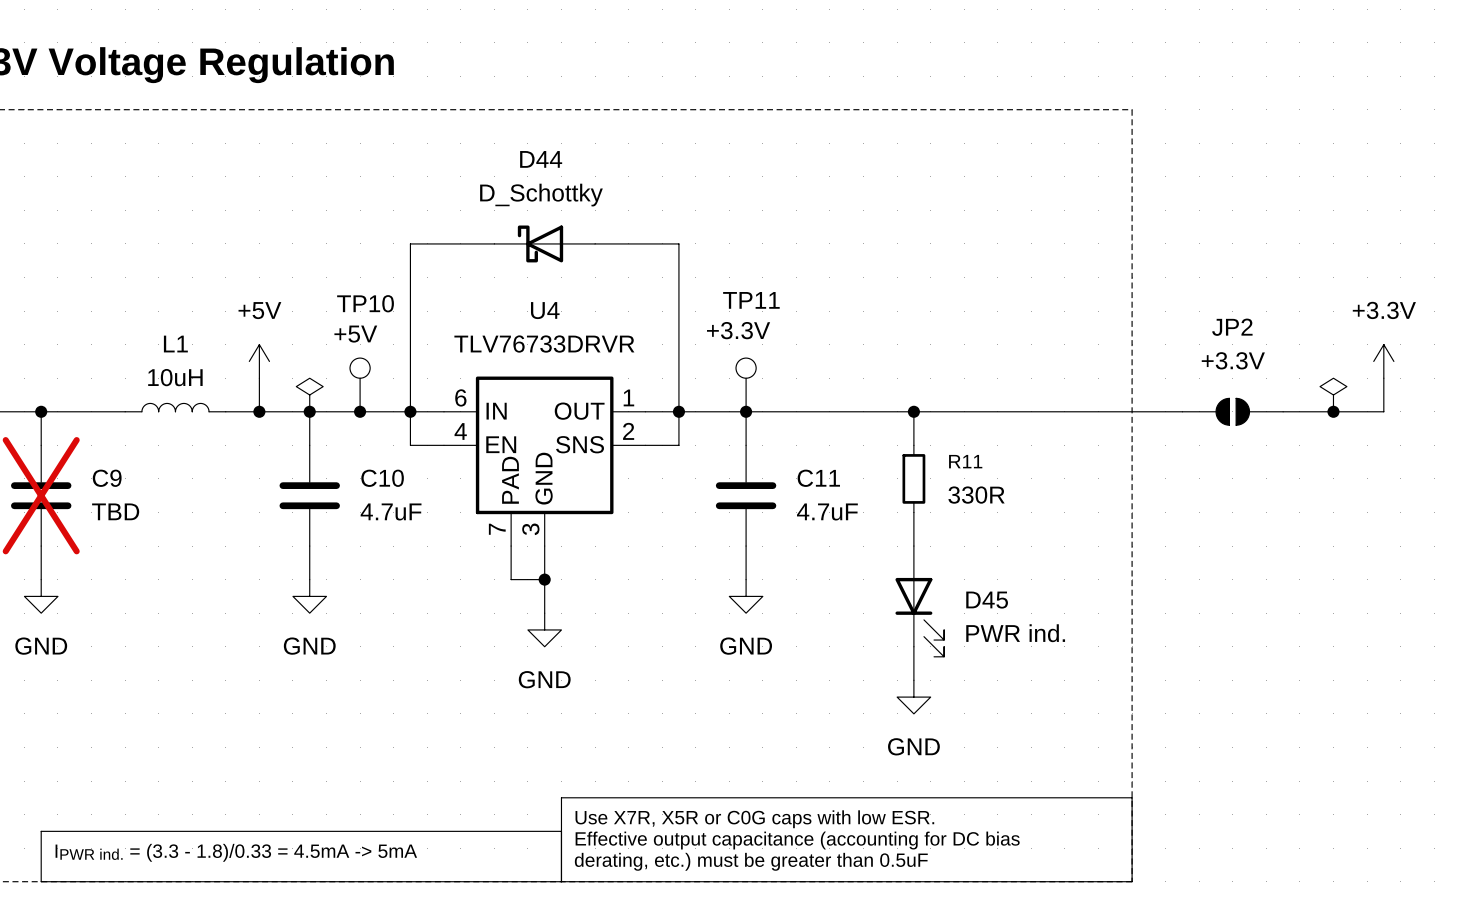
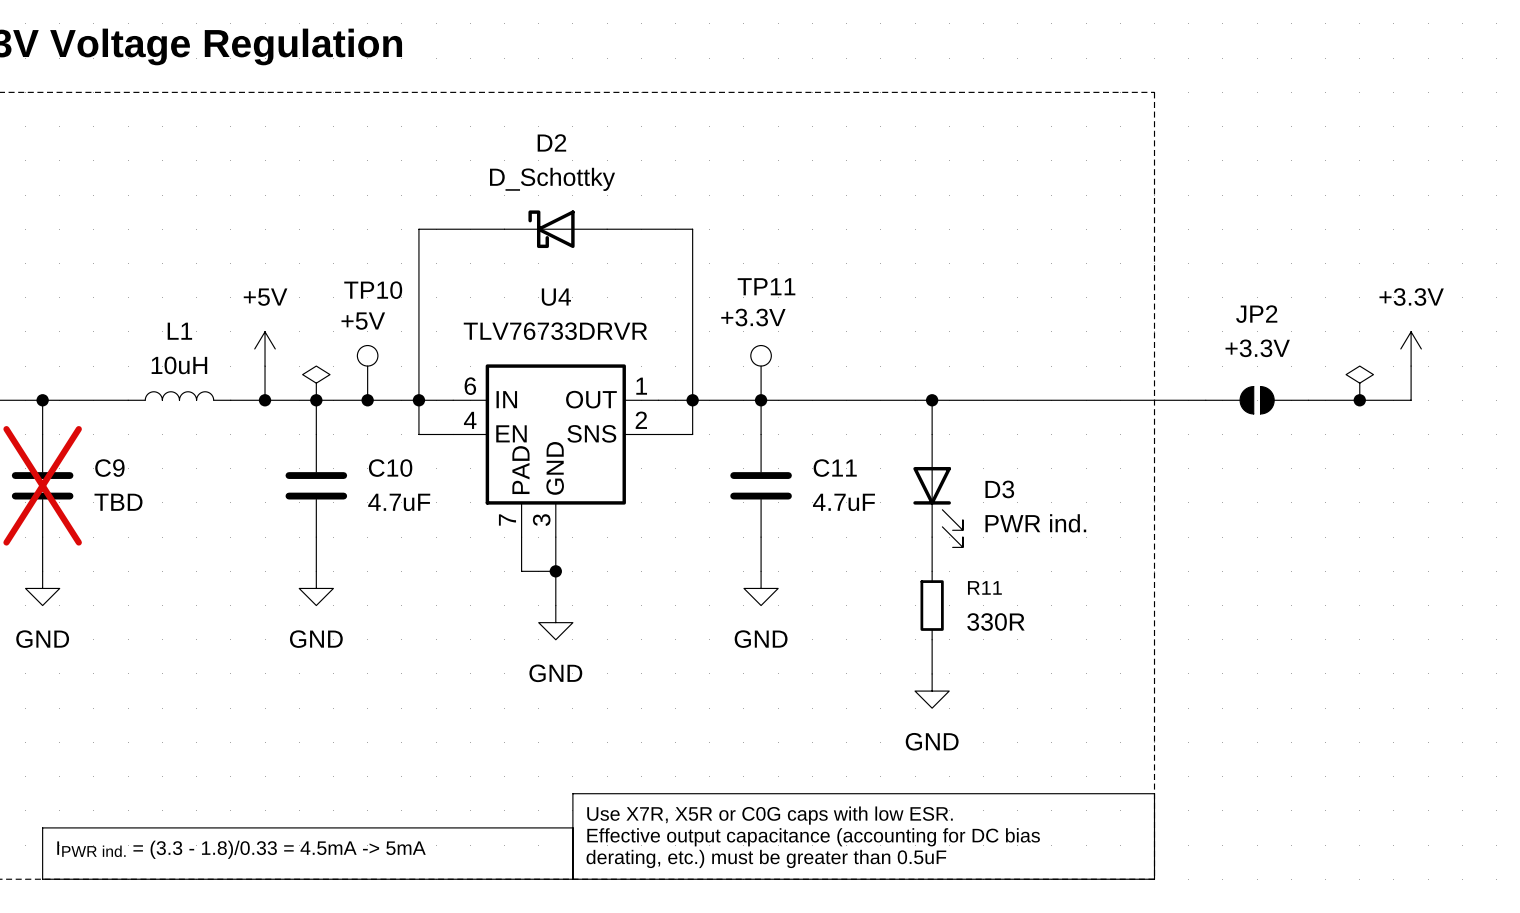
D44 name: D44 (541, 159) -> D2 (551, 142)
R11 position: (913, 478) -> (932, 605)
D3: none -> PWR ind. (938, 490)
D45: PWR ind. (919, 601) -> none

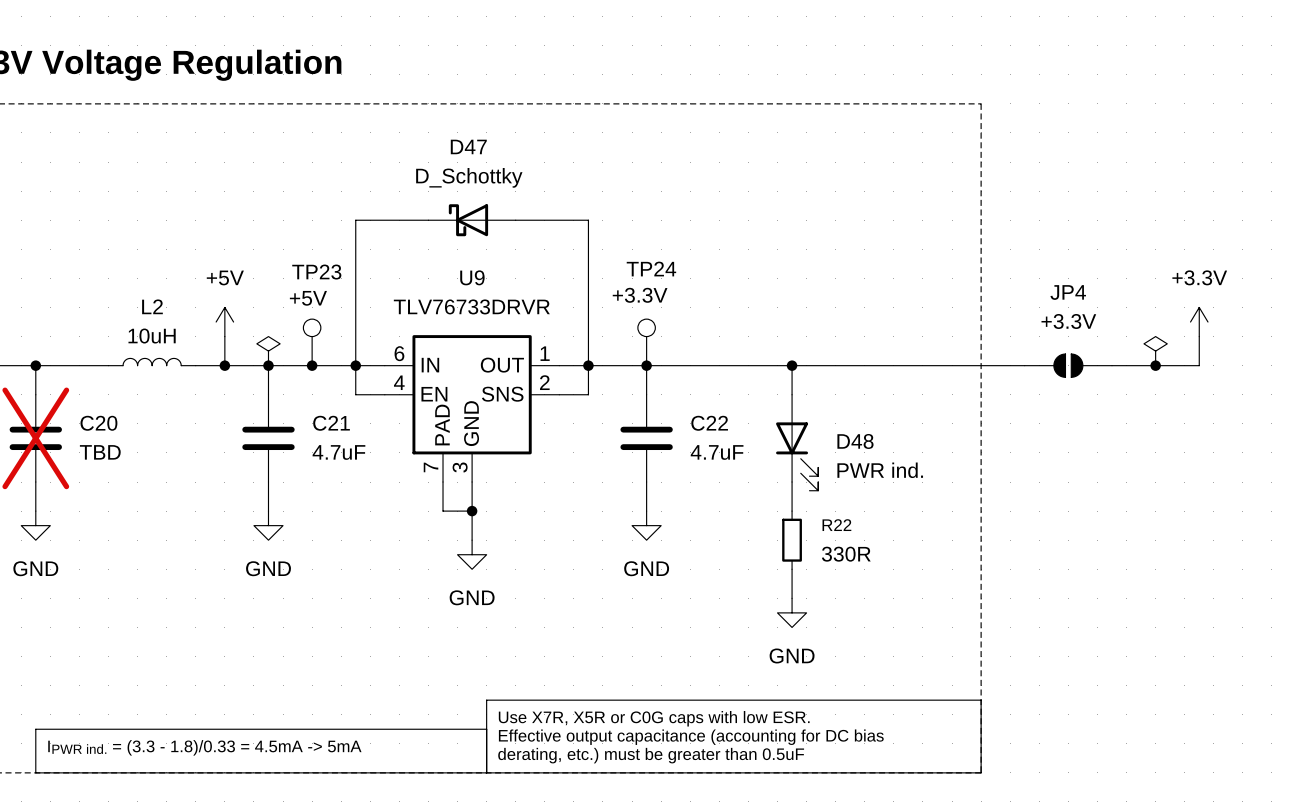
D2 name: D2 (551, 142) -> D47 (468, 146)
TP11 name: TP11 (766, 286) -> TP24 (651, 269)
TP10 name: TP10 (373, 290) -> TP23 (316, 272)
U4 name: U4 (556, 297) -> U9 (472, 277)
JP2 name: JP2 (1256, 314) -> JP4 (1068, 292)
L1 name: L1 (179, 331) -> L2 (152, 306)
C9 name: C9 (109, 468) -> C20 (98, 423)
C10 name: C10 (390, 468) -> C21 (331, 423)
C11 name: C11 (835, 468) -> C22 (709, 423)
D3 name: D3 (999, 489) -> D48 (855, 441)
R11 name: R11 (984, 587) -> R22 (836, 525)

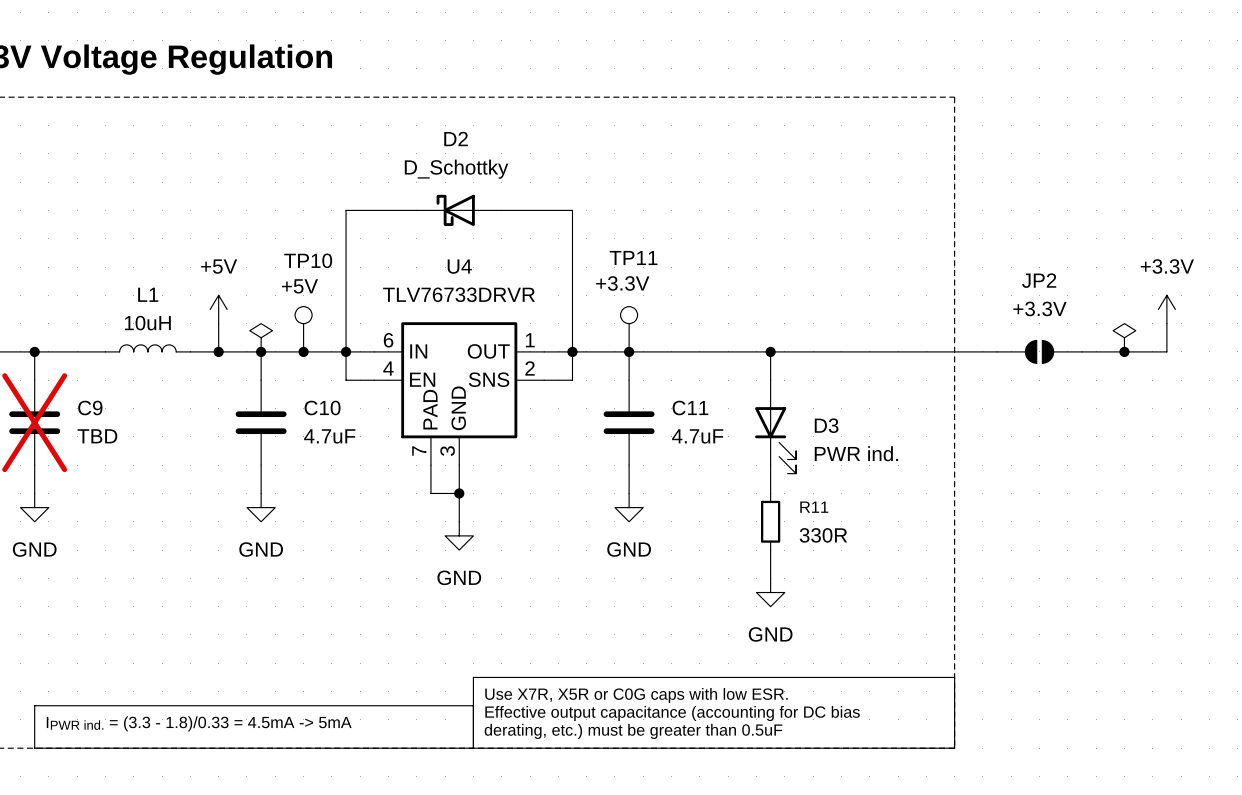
D47 name: D47 (468, 146) -> D2 (456, 139)
TP24 name: TP24 (651, 269) -> TP11 (633, 257)
TP23 name: TP23 (316, 272) -> TP10 (308, 260)
U9 name: U9 (472, 277) -> U4 (459, 266)
JP4 name: JP4 (1068, 292) -> JP2 (1039, 280)
L2 name: L2 (152, 306) -> L1 (148, 294)
C20 name: C20 (98, 423) -> C9 (90, 408)
C21 name: C21 (331, 423) -> C10 (322, 408)
C22 name: C22 (709, 423) -> C11 (690, 408)
D48 name: D48 (855, 441) -> D3 (826, 425)
R22 name: R22 (836, 525) -> R11 (814, 507)

